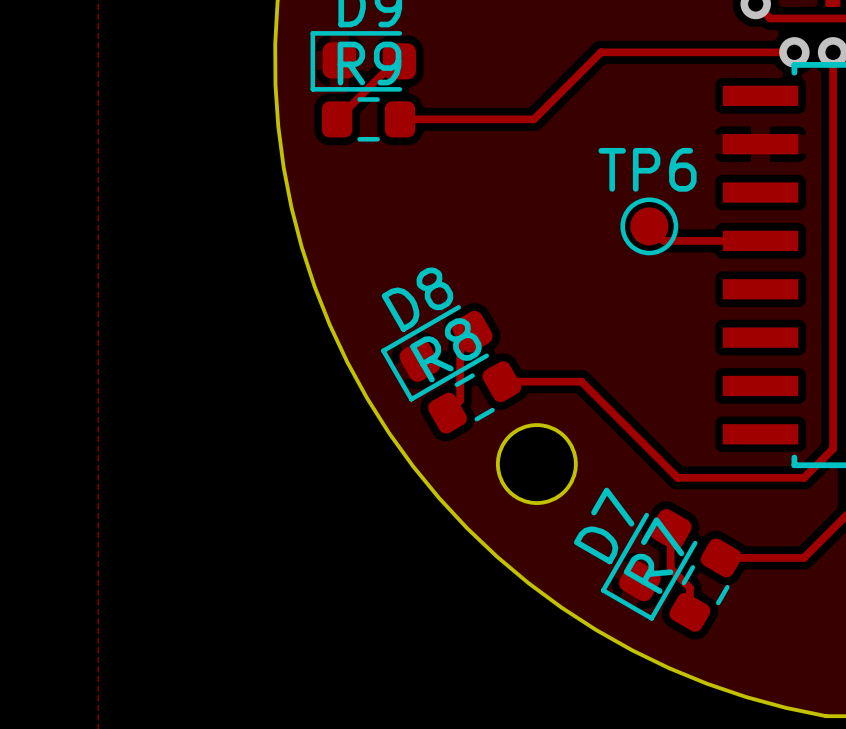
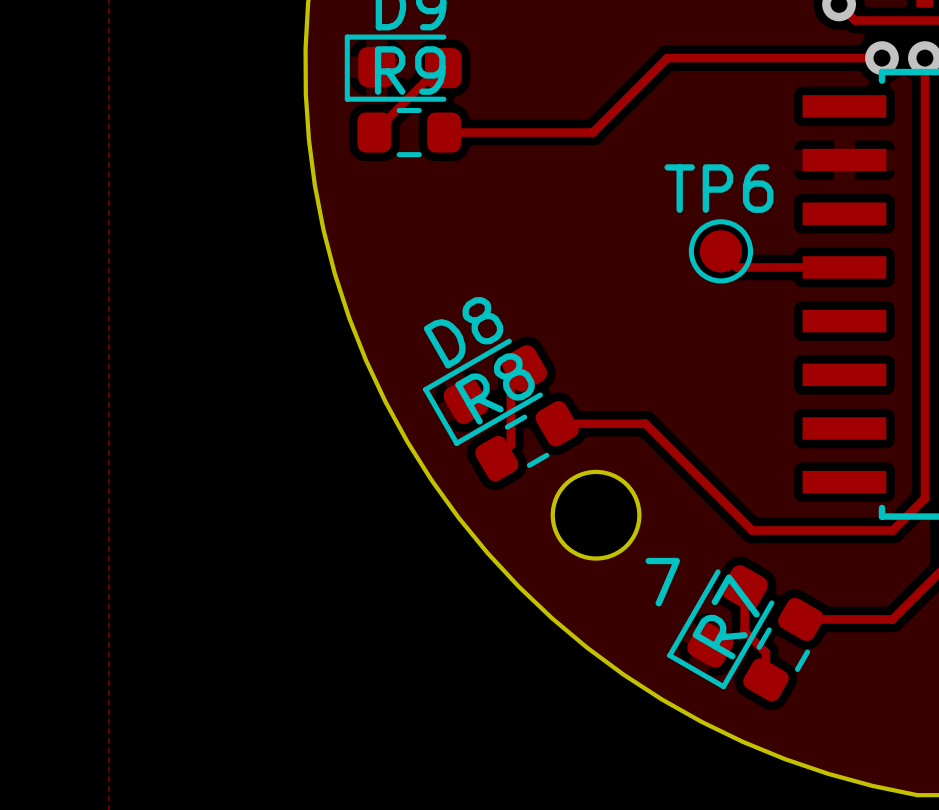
text: none -> 7 (662, 582)
D7 name: D7 (604, 525) -> none

